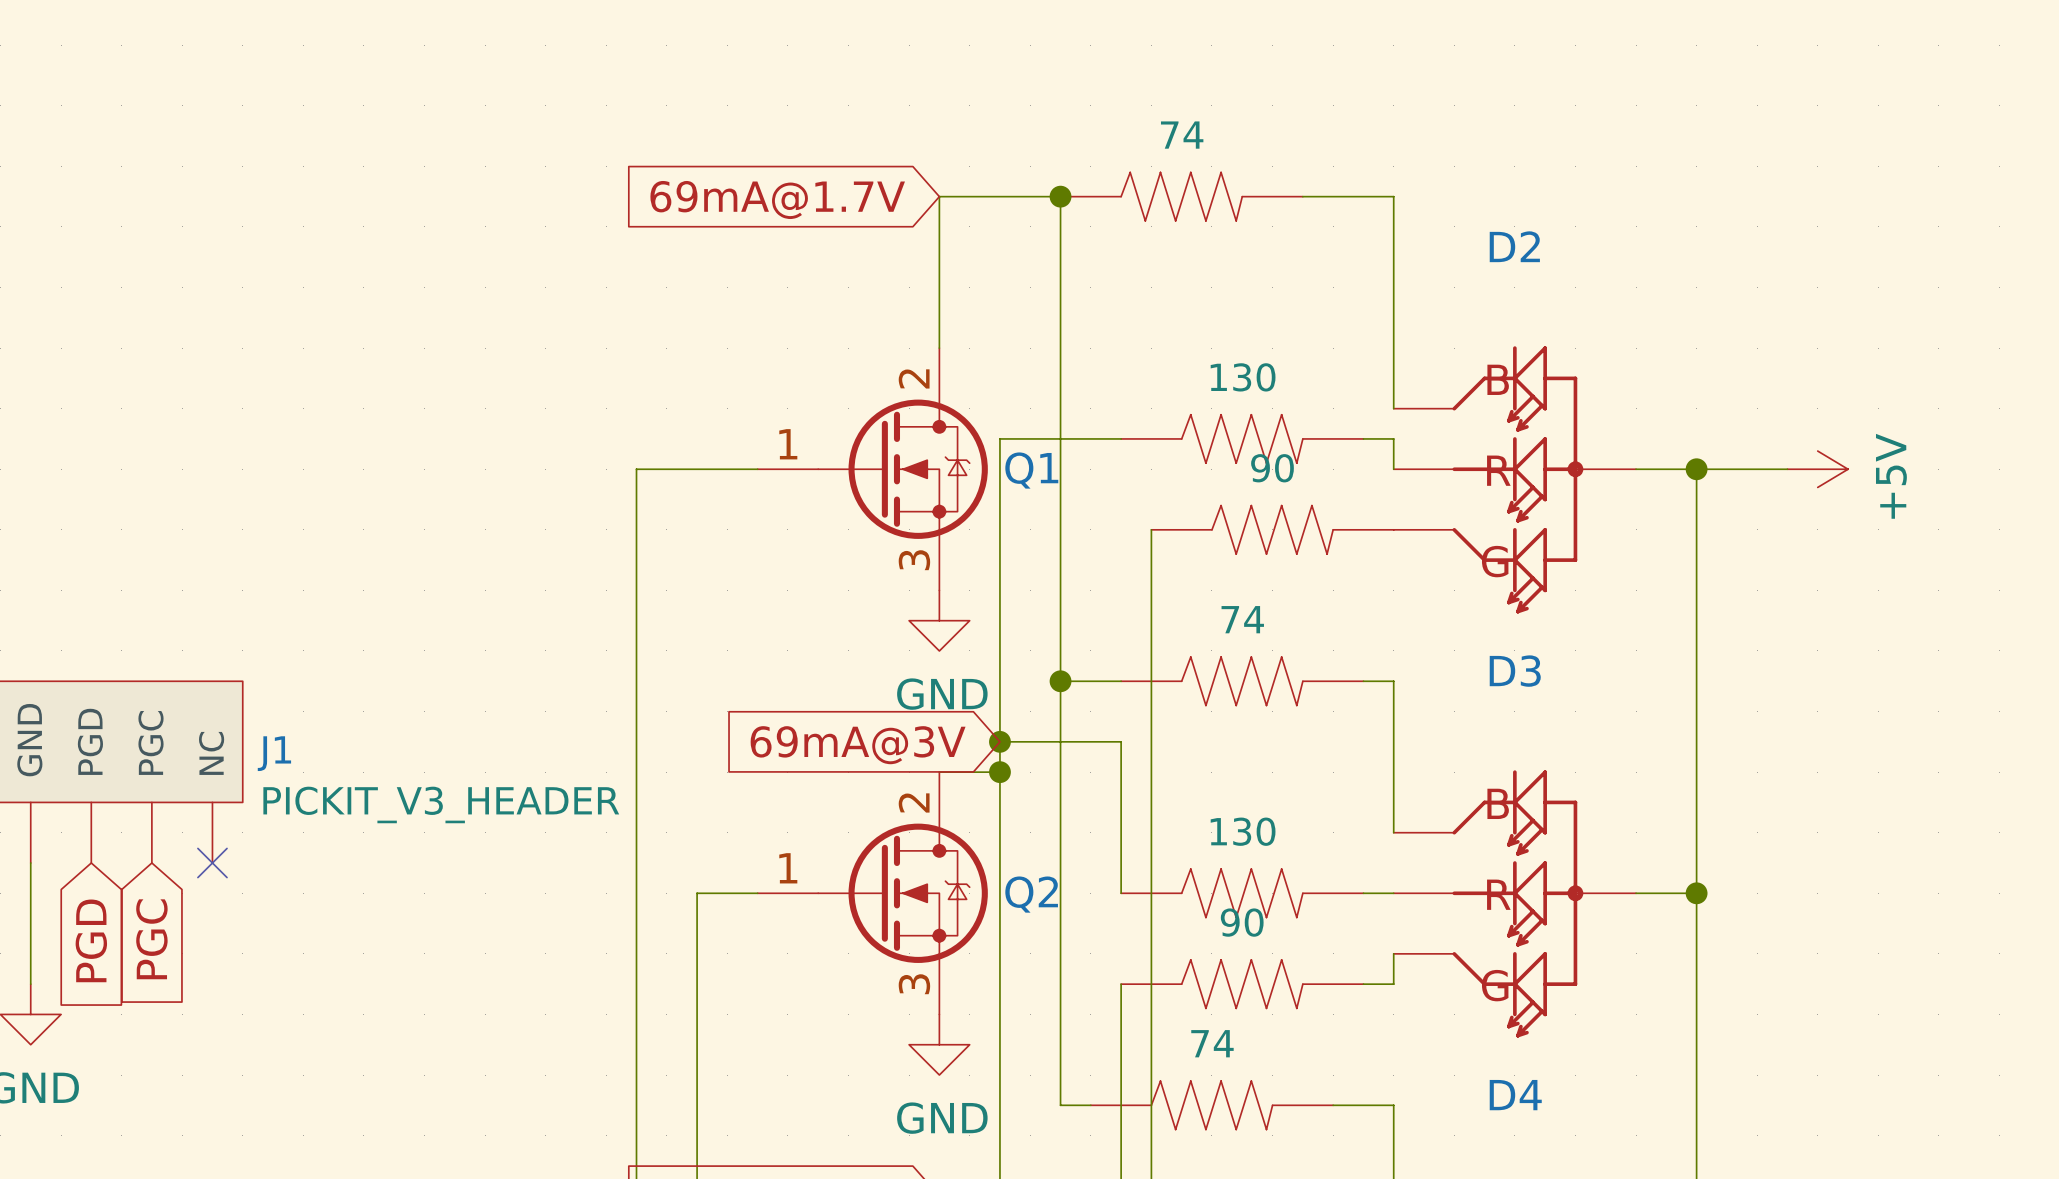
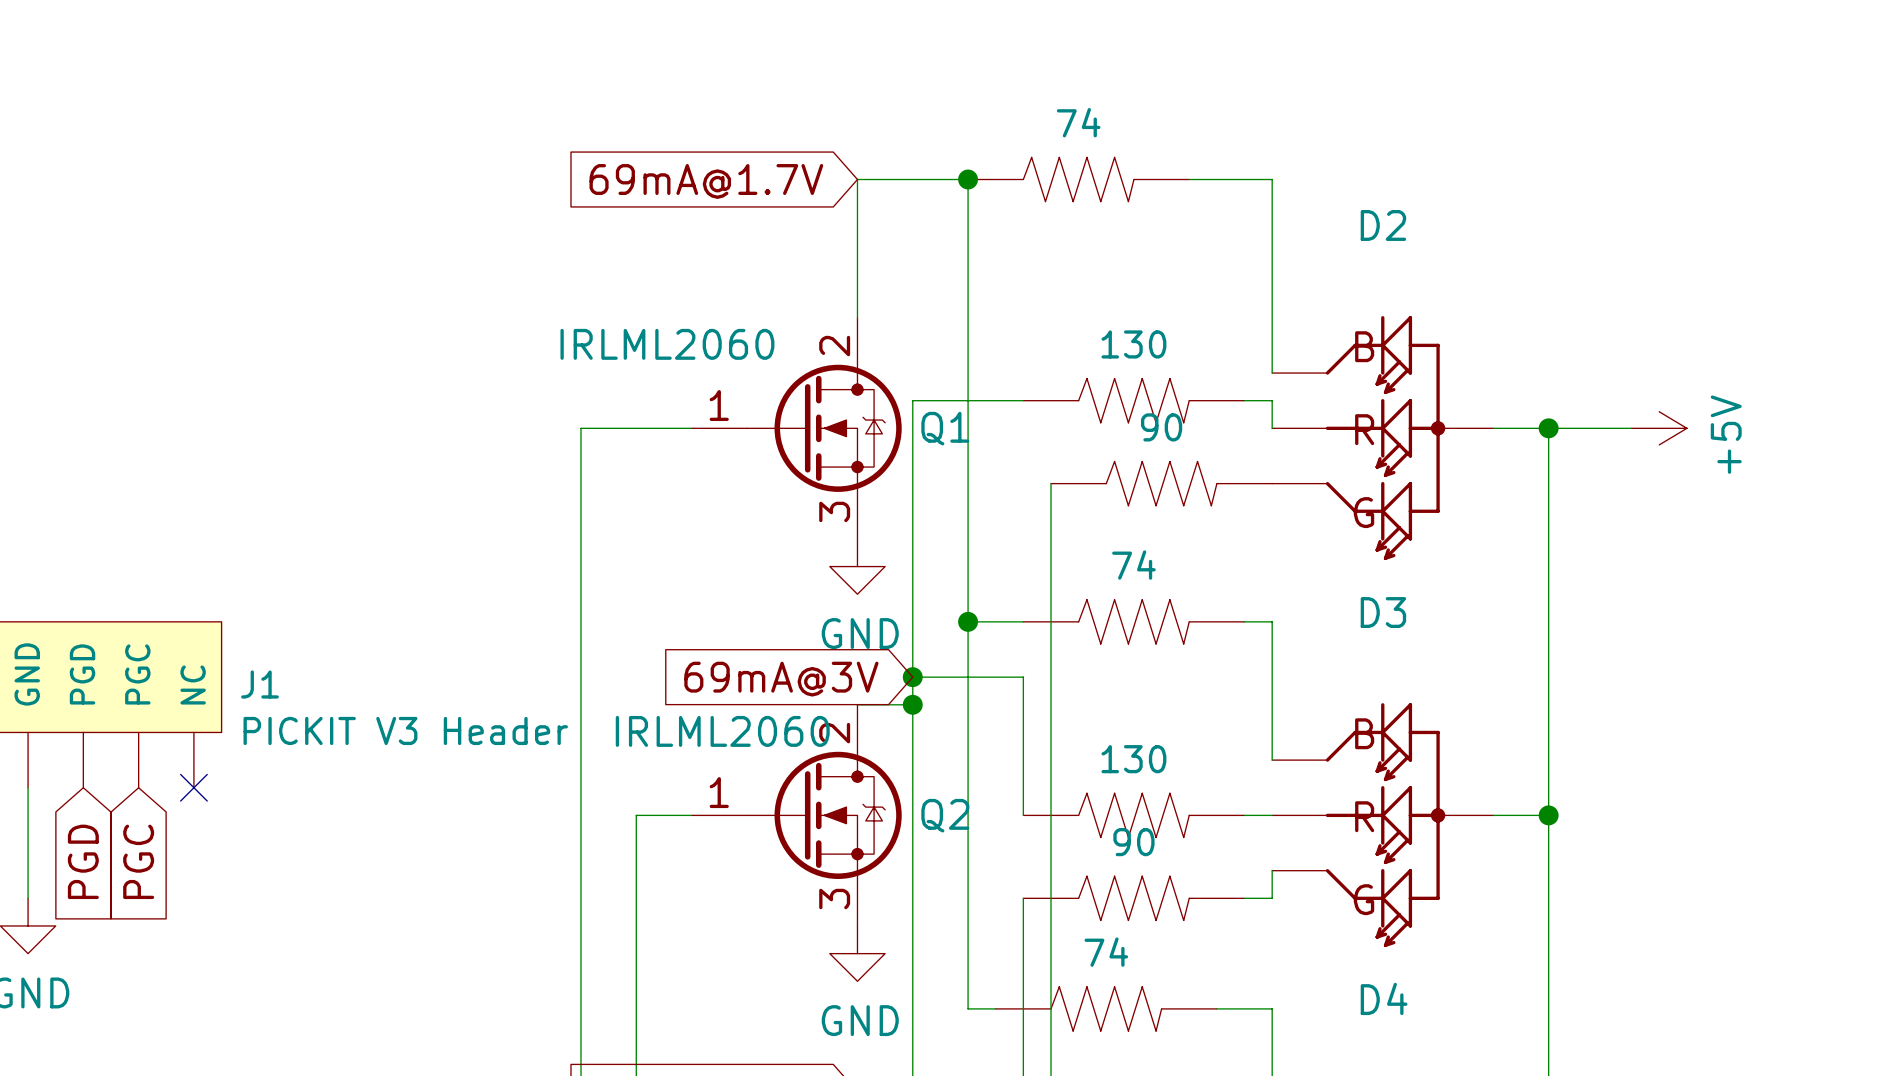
Q1 value: none -> IRLML2060 (667, 344)
Q2 value: none -> IRLML2060 (722, 731)
J1 value: PICKIT_V3_HEADER (441, 804) -> PICKIT V3 Header (405, 730)

